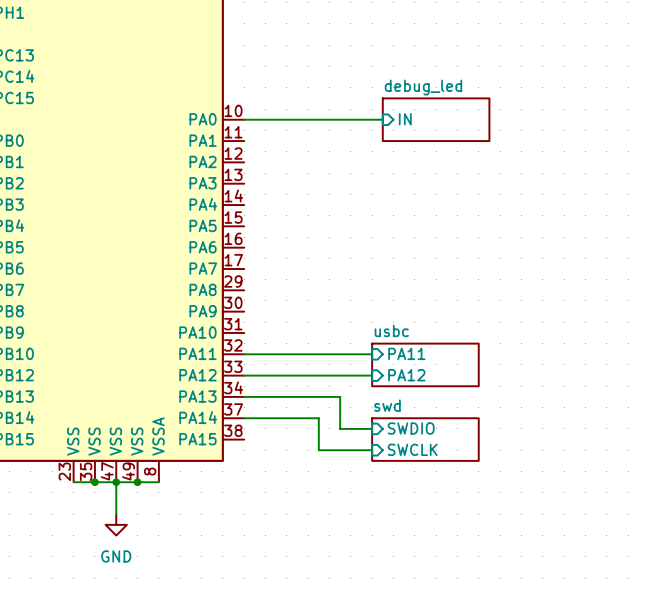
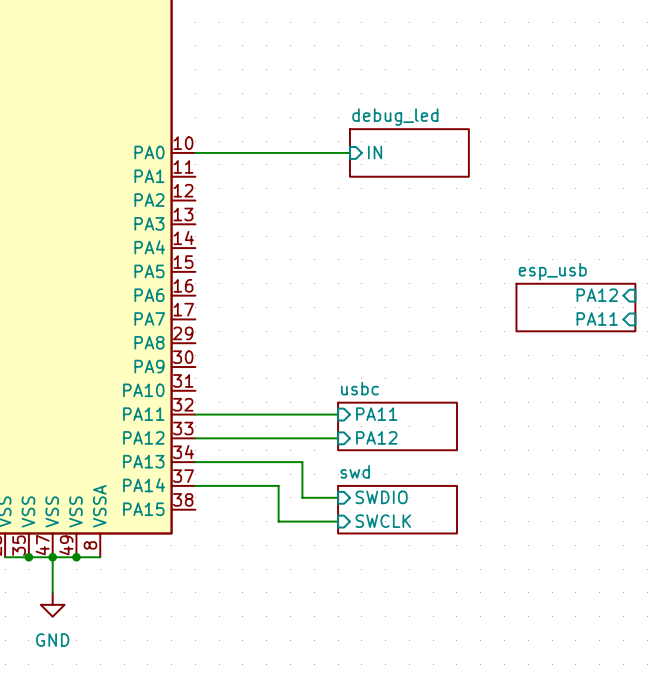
sheet pin: none -> PA12 (597, 295)
sheet esp_usb: none -> (575, 307)
sheet pin: none -> PA11 (597, 318)

